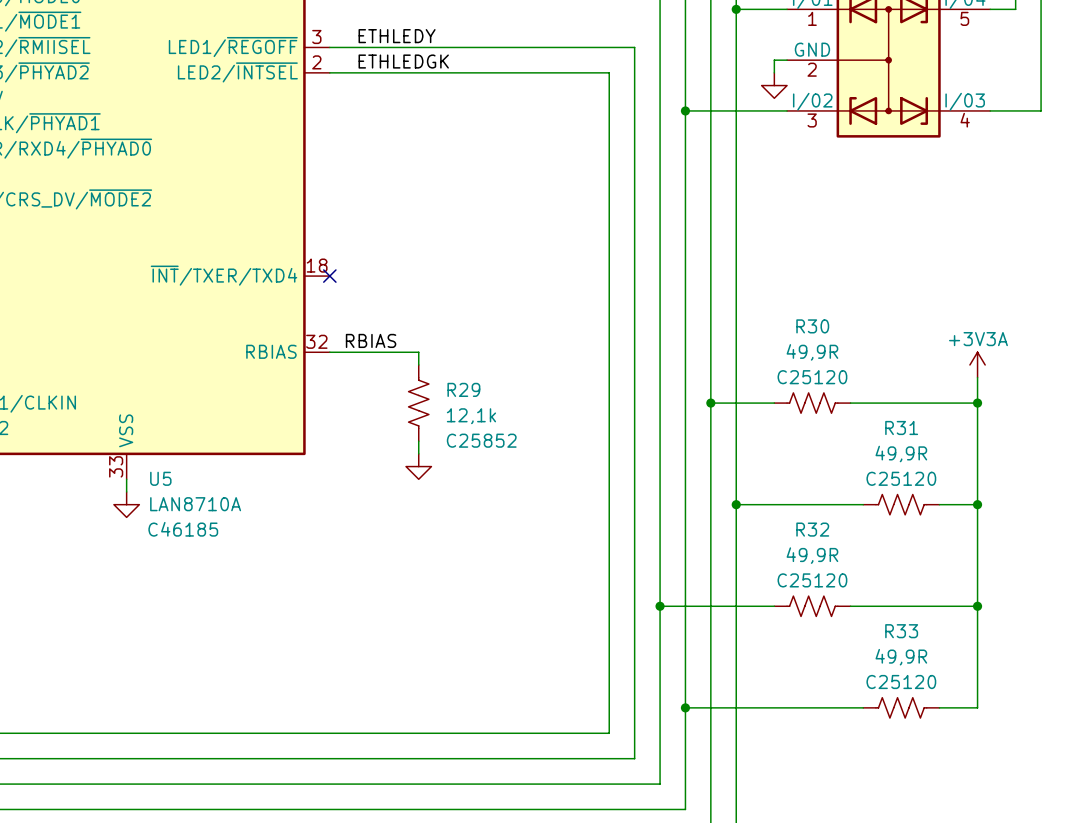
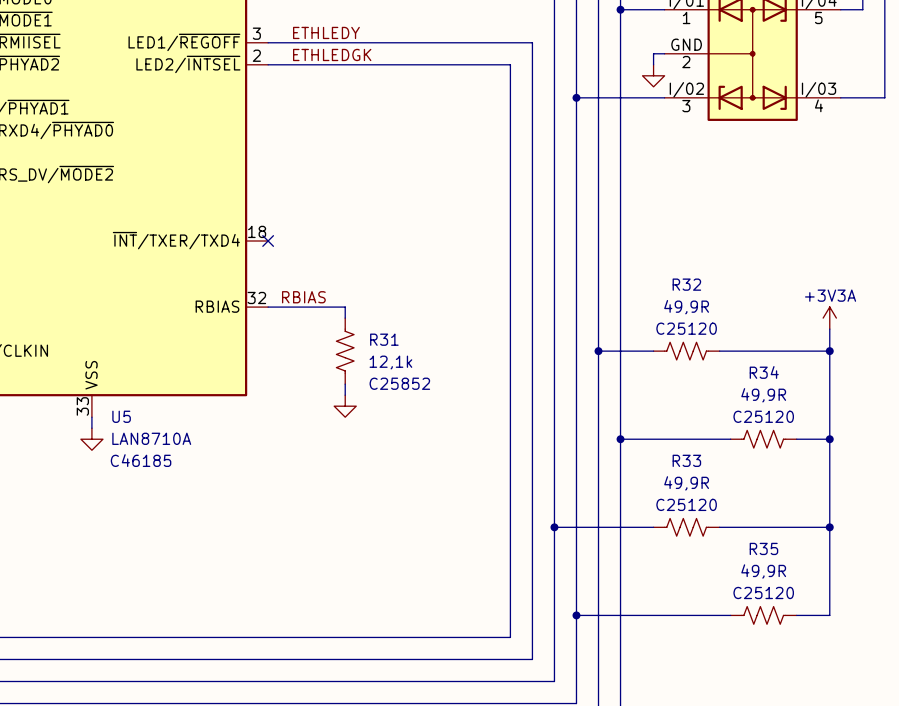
R30 name: R30 (812, 326) -> R32 (686, 284)
R29 name: R29 (463, 389) -> R31 (384, 339)
R31 name: R31 (901, 427) -> R34 (764, 372)
R32 name: R32 (812, 529) -> R33 (686, 460)
R33 name: R33 (901, 631) -> R35 (763, 548)

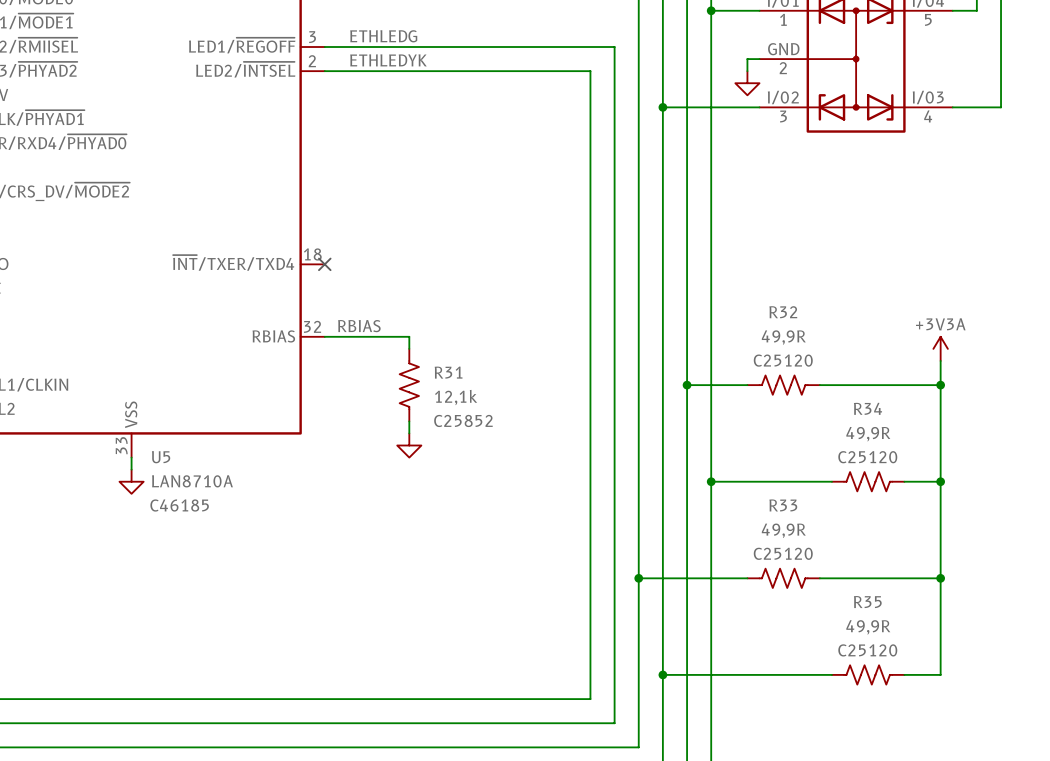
label: ETHLEDY (326, 32) -> ETHLEDG (383, 36)
label: ETHLEDGK (332, 54) -> ETHLEDYK (388, 60)

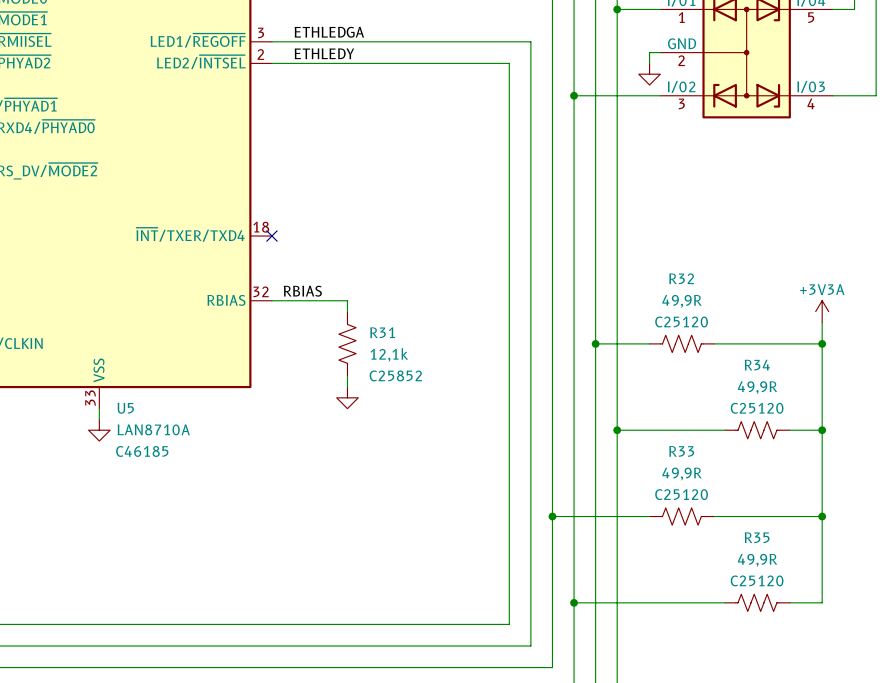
label: ETHLEDG (383, 36) -> ETHLEDGA (329, 32)
label: ETHLEDYK (388, 60) -> ETHLEDY (324, 53)

